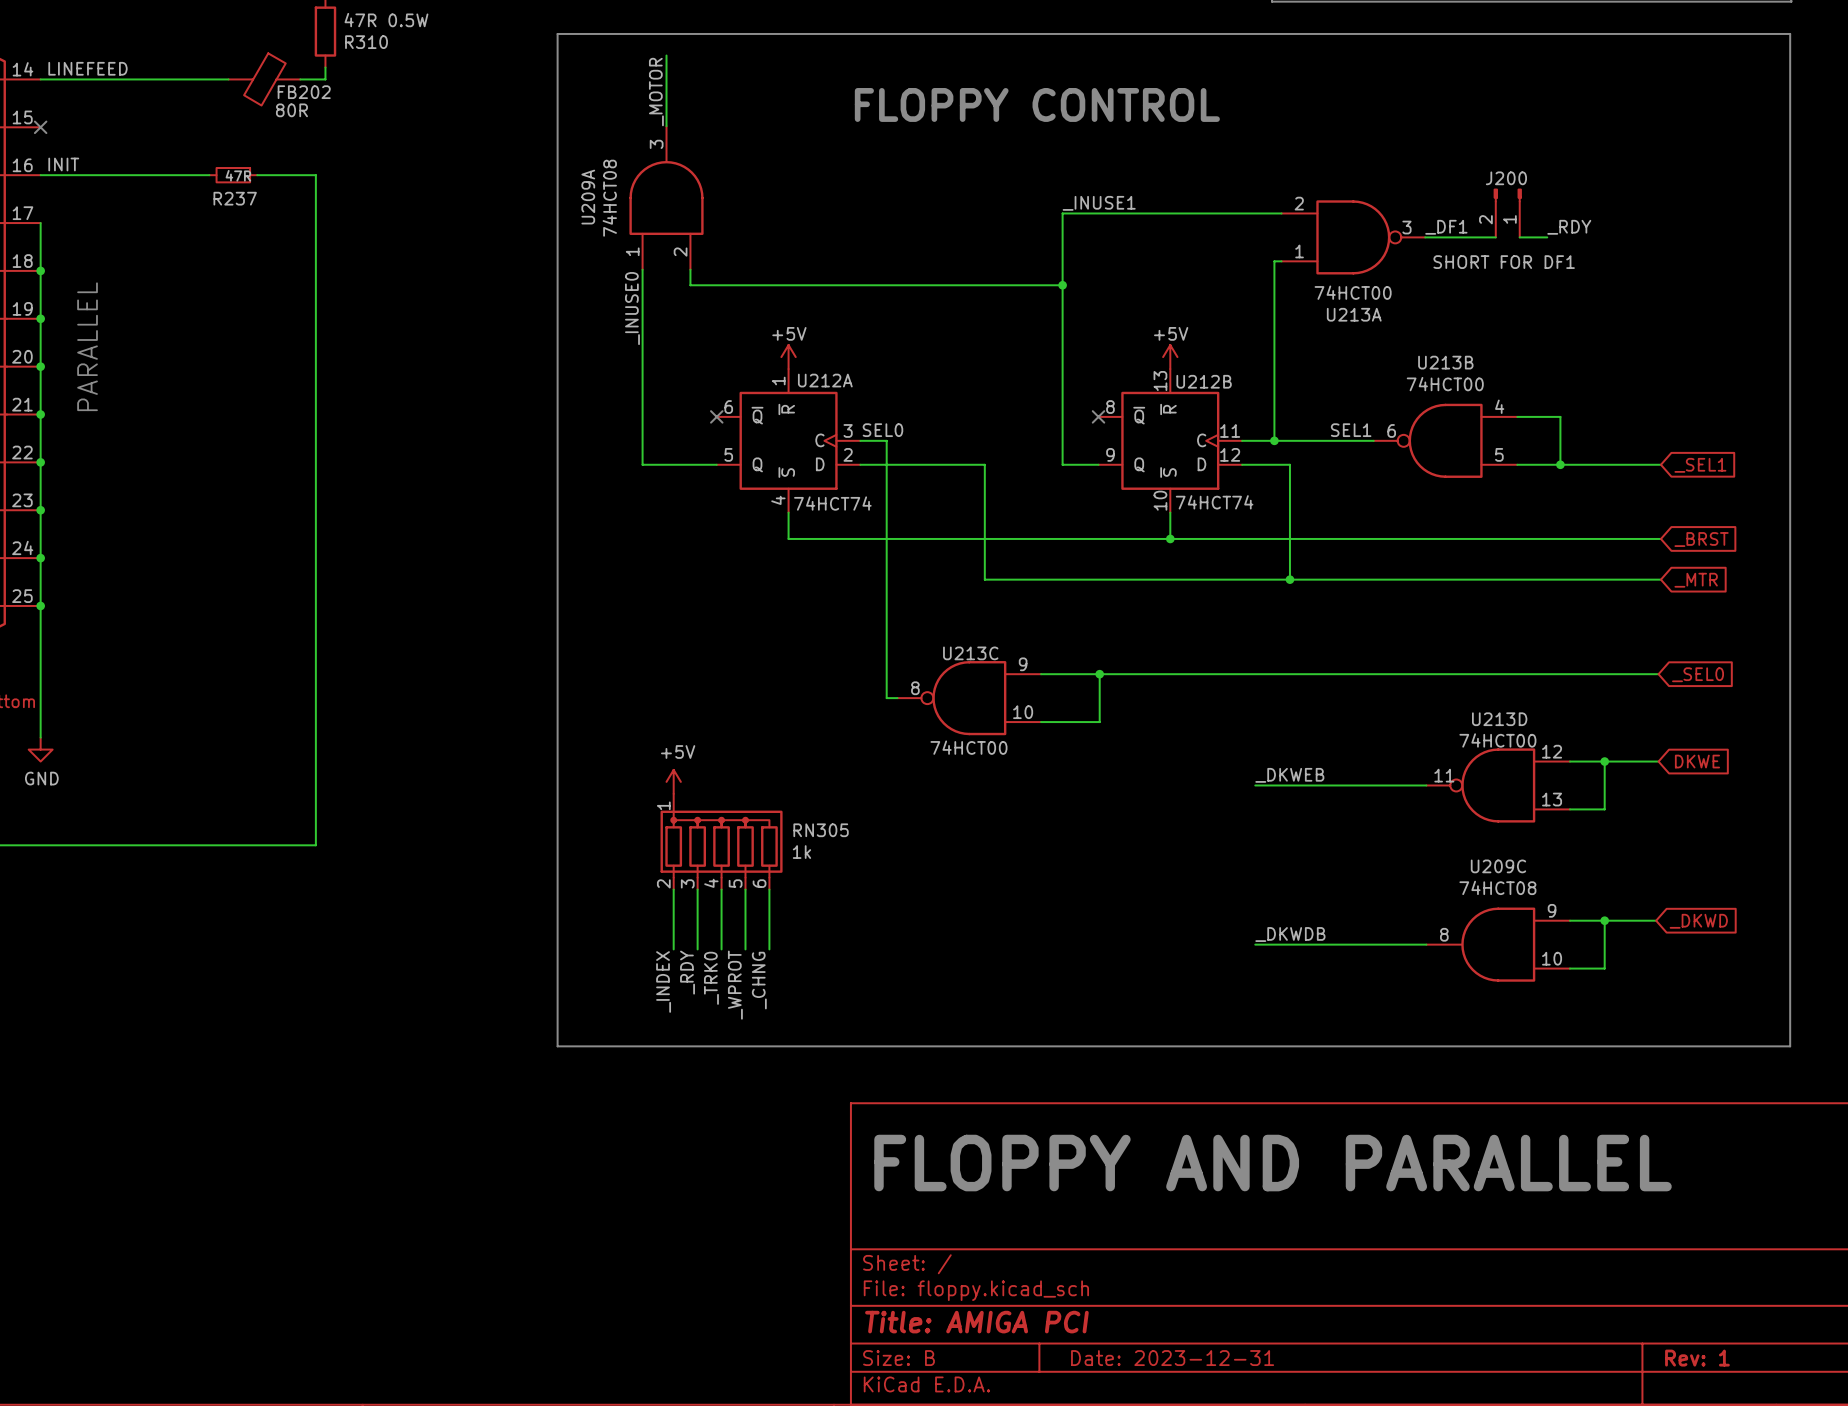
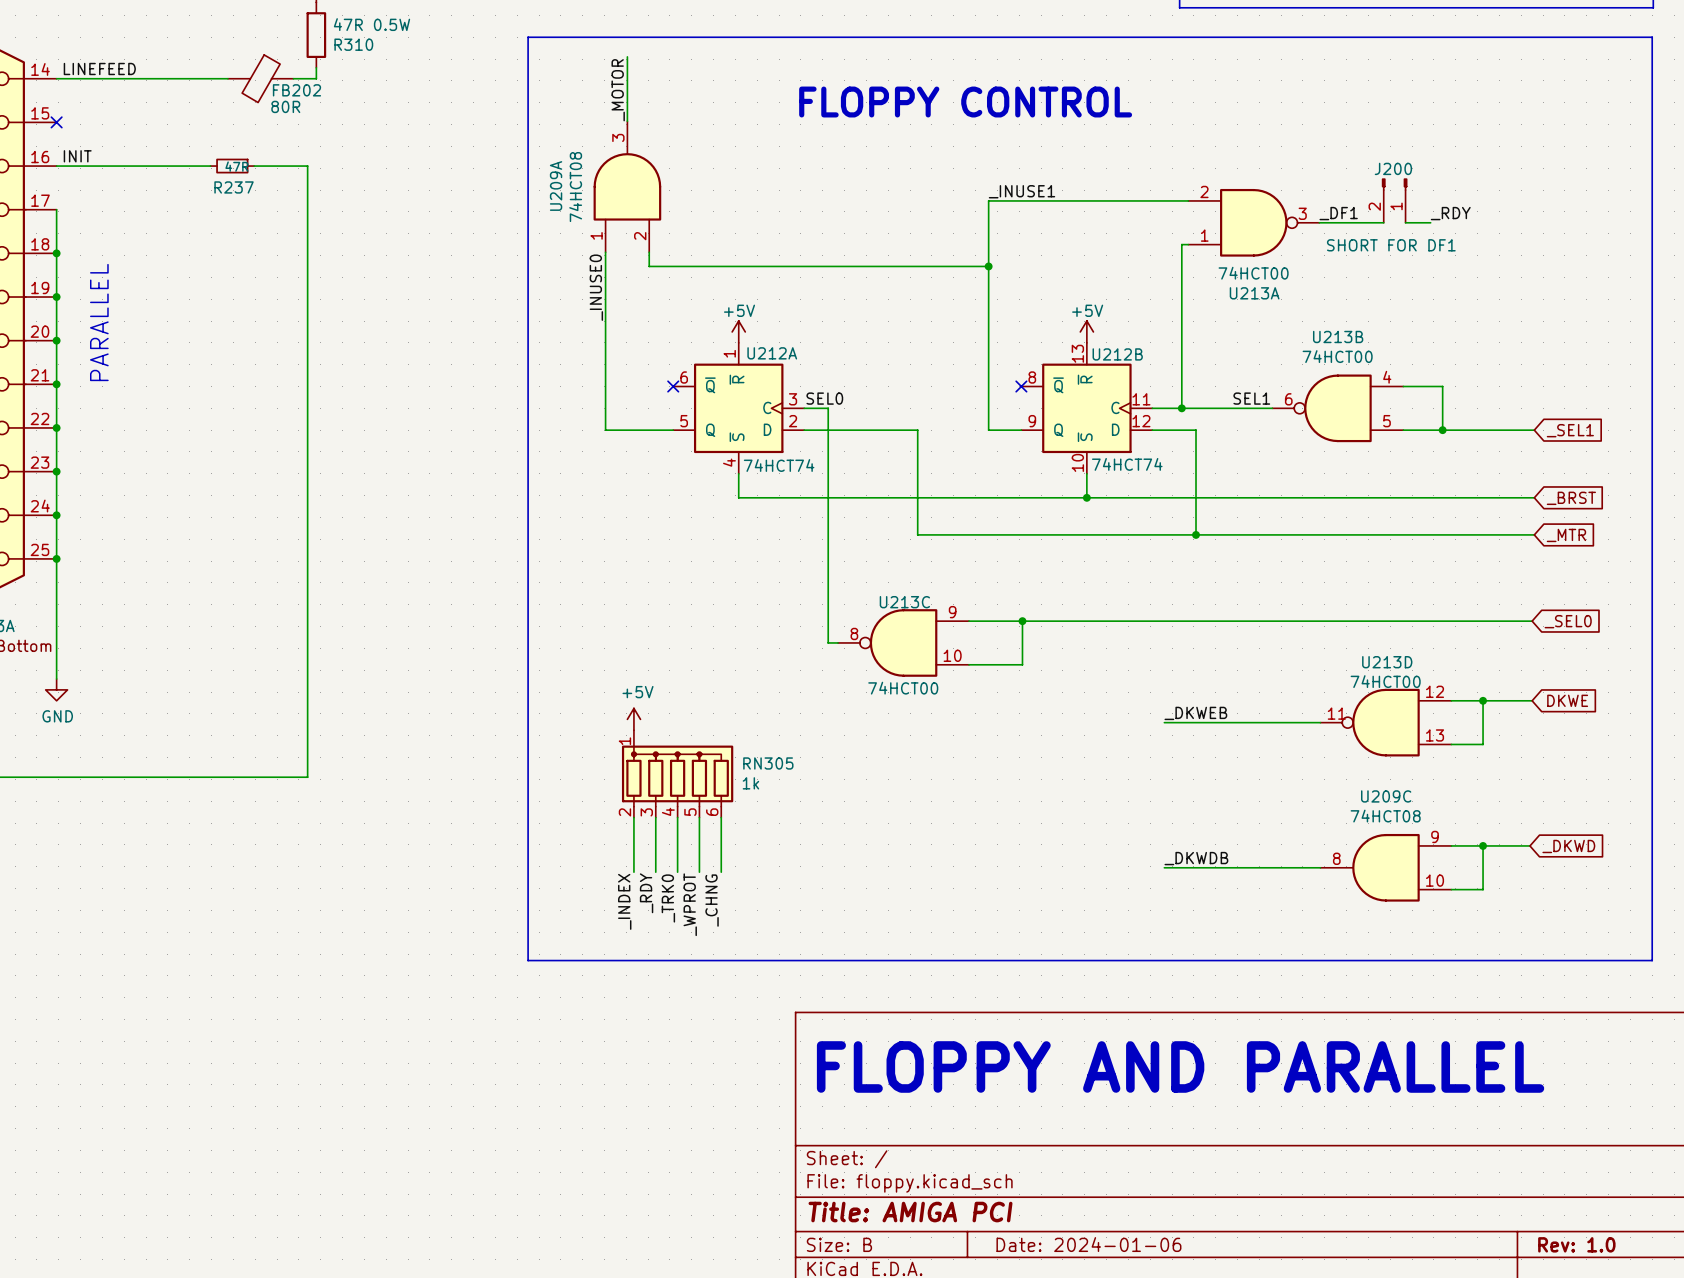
title block: Date: 2023-12-31 (1172, 1358) -> Date: 2024-01-06 (1088, 1244)
title block: Rev: 1 (1697, 1358) -> Rev: 1.0 (1576, 1244)

